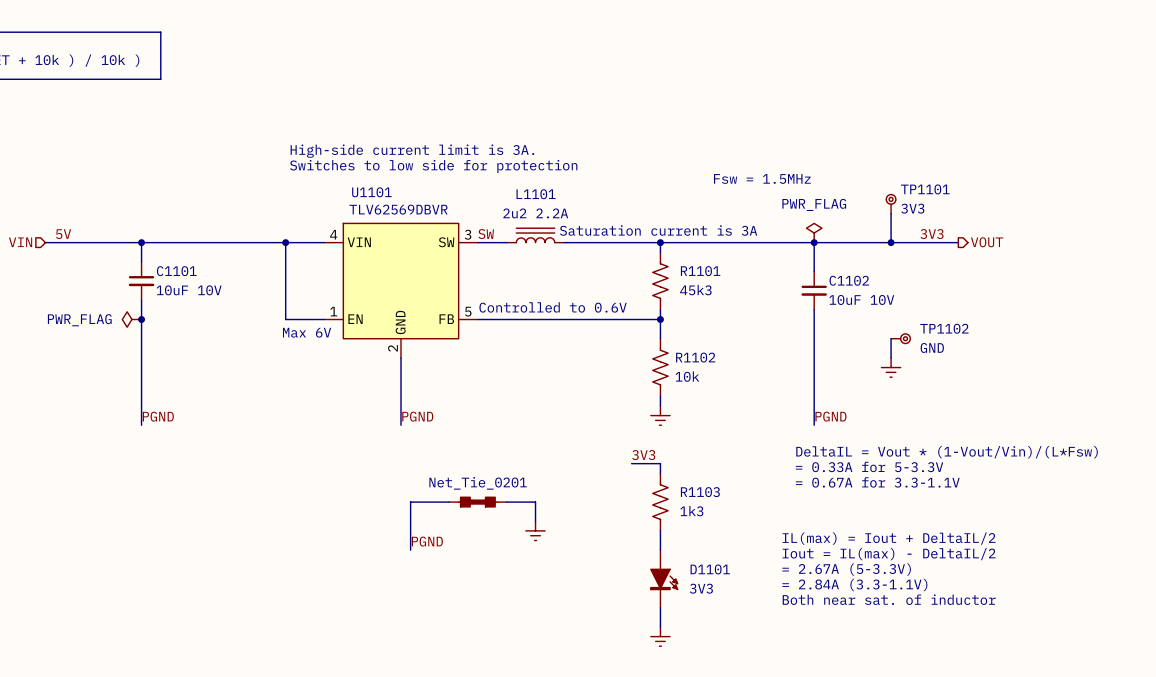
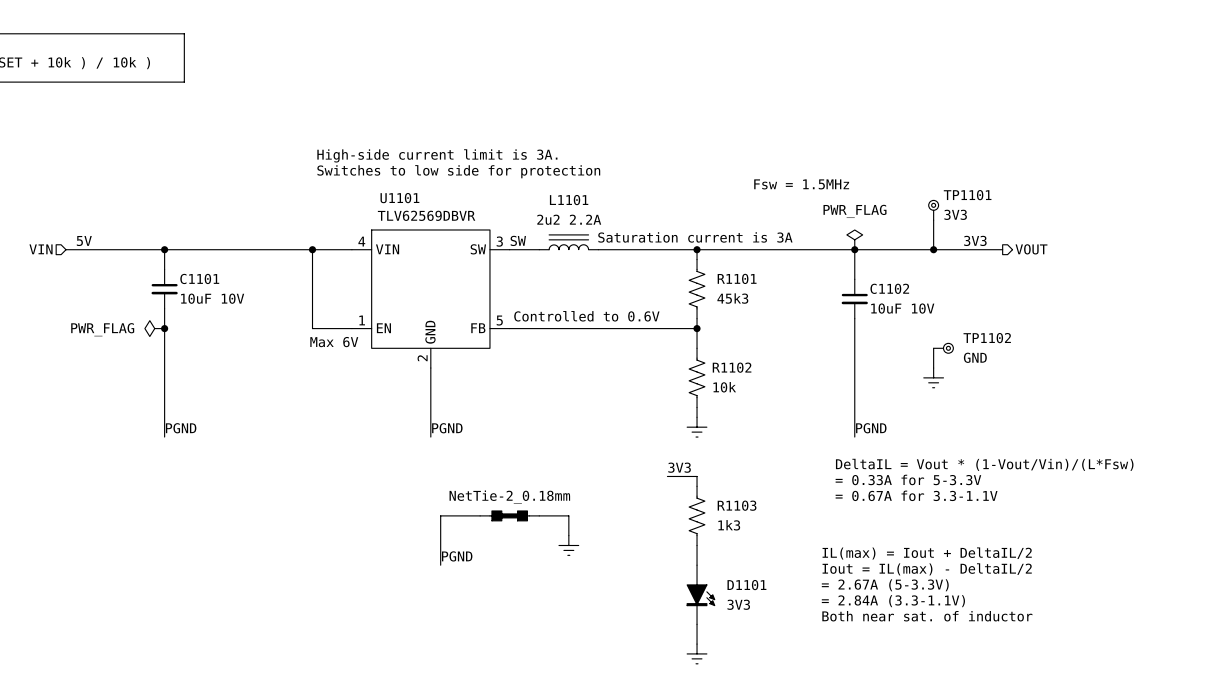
part value: Net_Tie_0201 (478, 483) -> NetTie-2_0.18mm (509, 497)

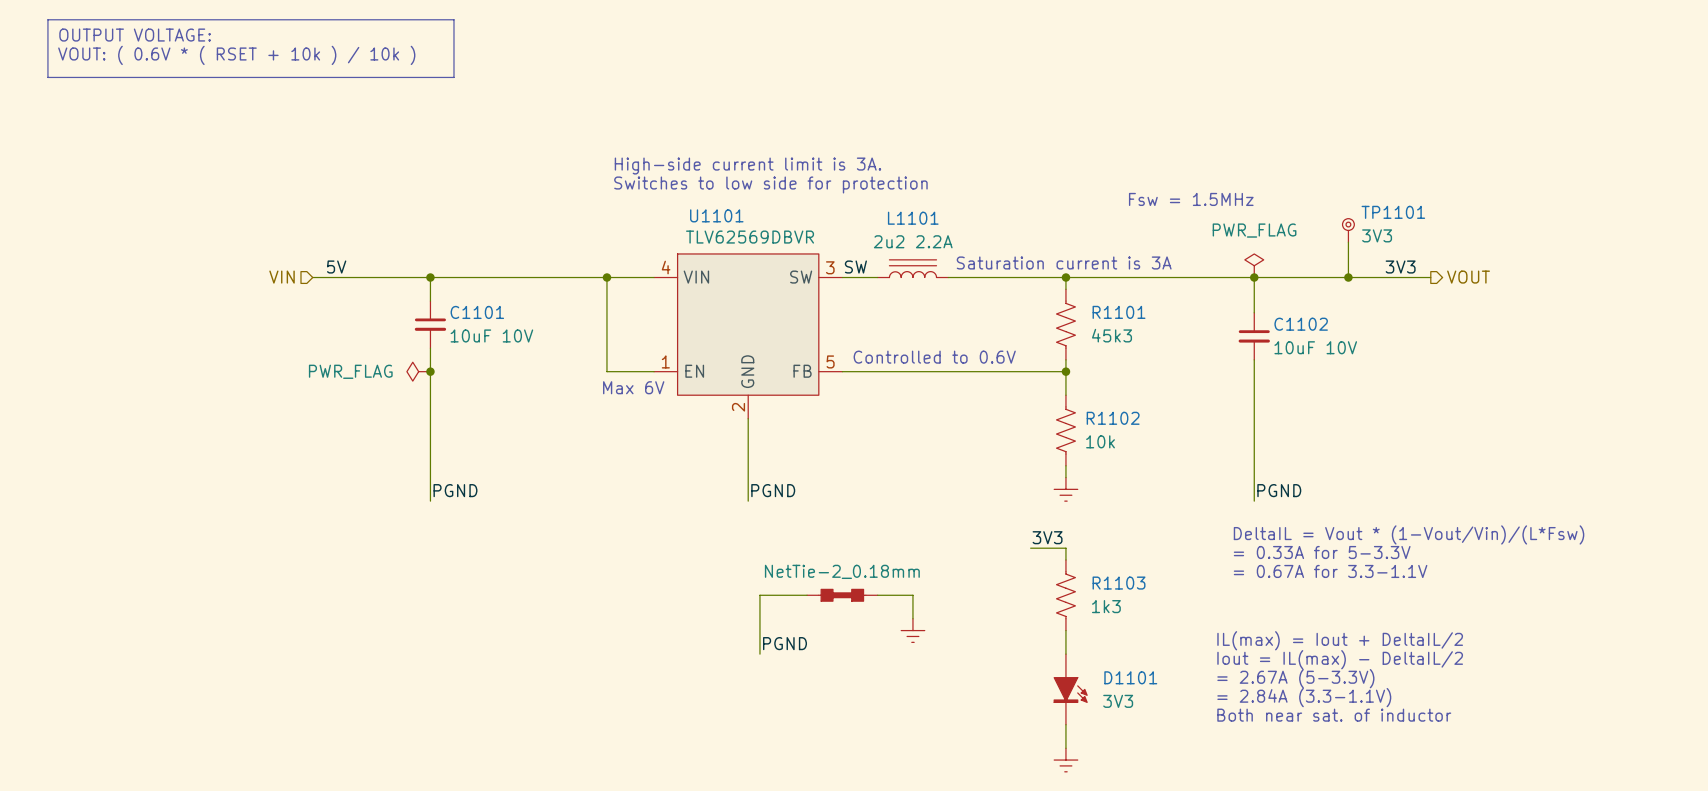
wire: (933, 348) (933, 368) -> none
TP1102: GND (943, 348) -> none
power symbol: (933, 377) -> none

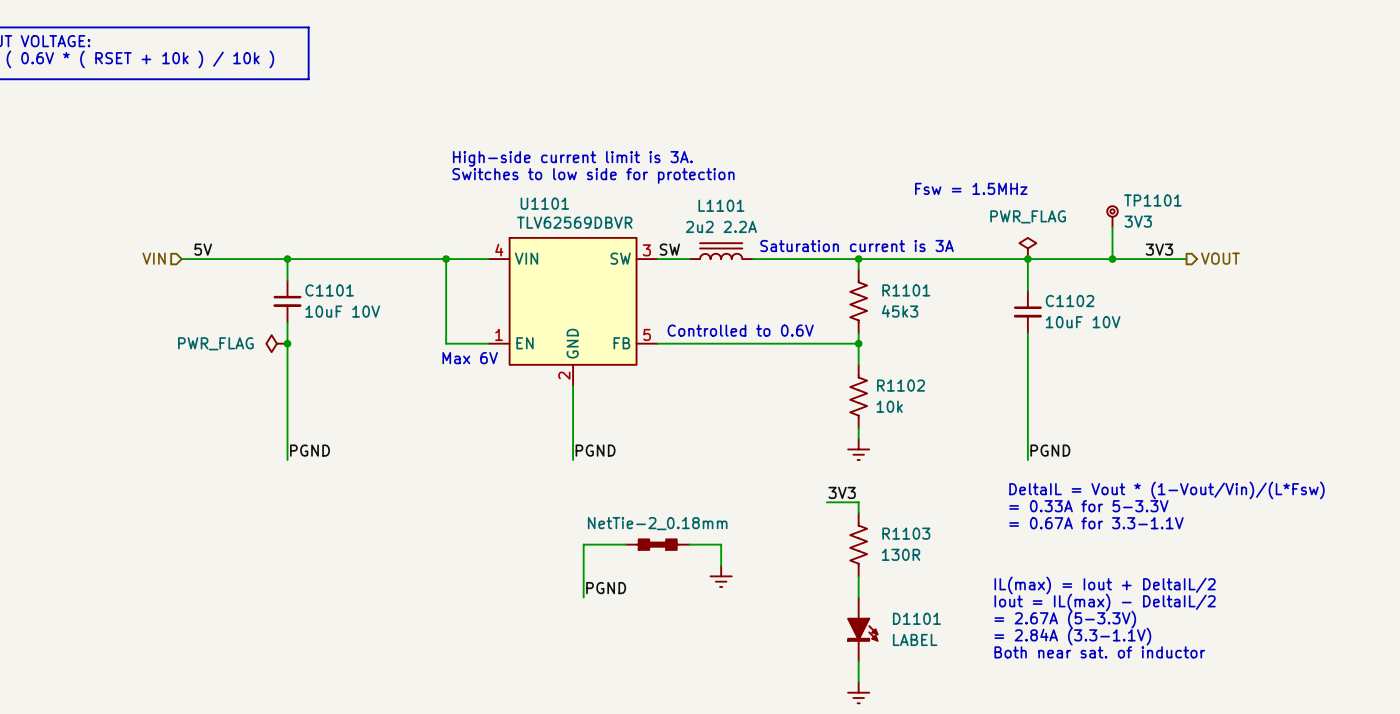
R1103 value: 1k3 (1106, 606) -> 130R (901, 554)
D1101 value: 3V3 (1118, 701) -> LABEL (915, 639)

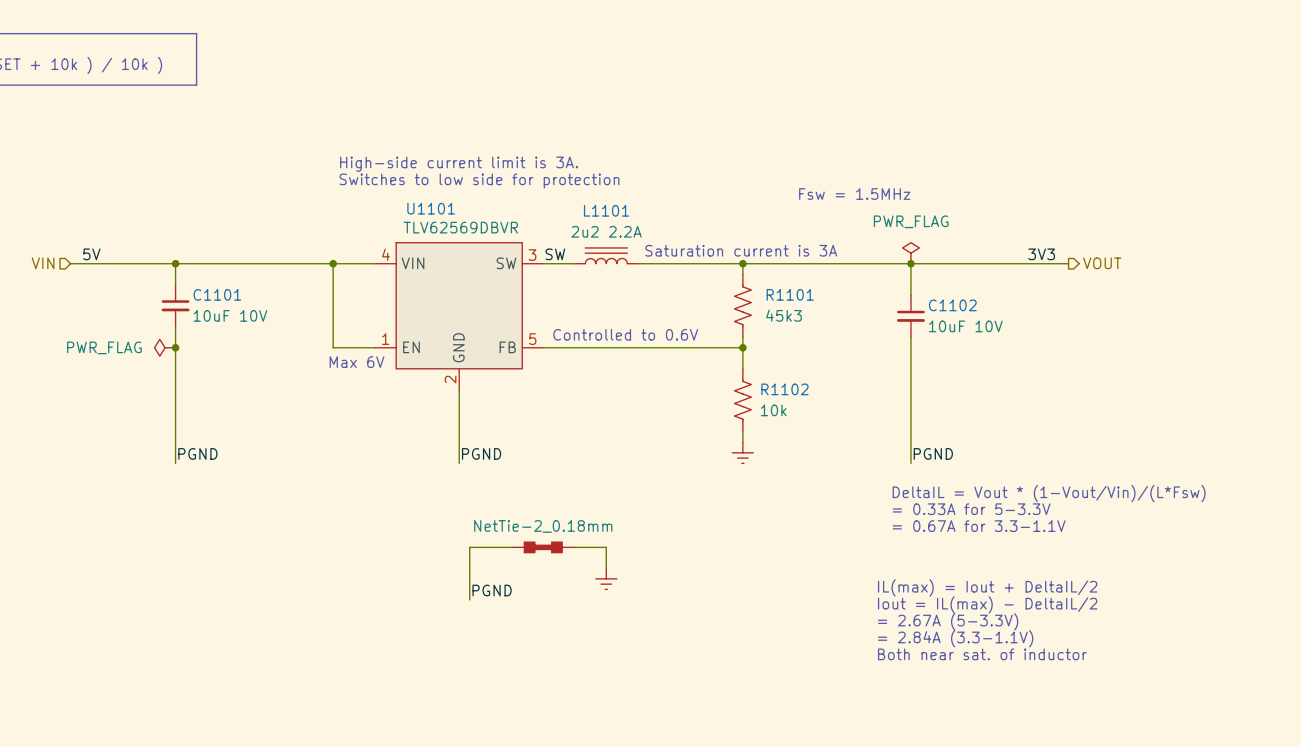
TP1101: 3V3 (1112, 216) -> none
wire: (1112, 227) (1112, 259) -> none
junction: (1112, 259) -> none
label: 3V3 (842, 492) -> none
wire: (826, 502) (858, 502) (858, 512) -> none
R1103: 130R (858, 544) -> none
wire: (858, 576) (858, 597) -> none
D1101: LABEL (862, 629) -> none
wire: (858, 660) (858, 682) -> none
power symbol: (858, 692) -> none

